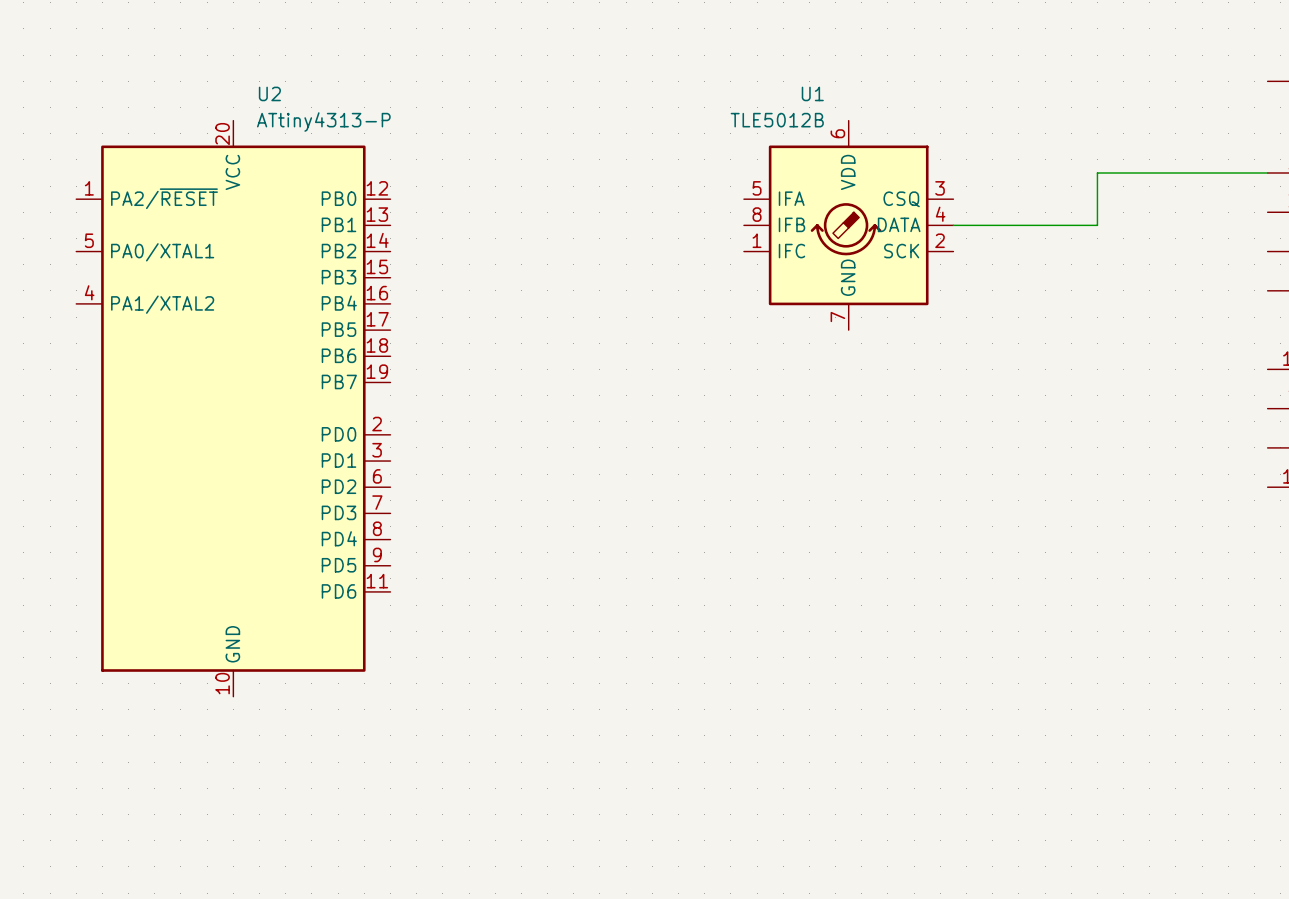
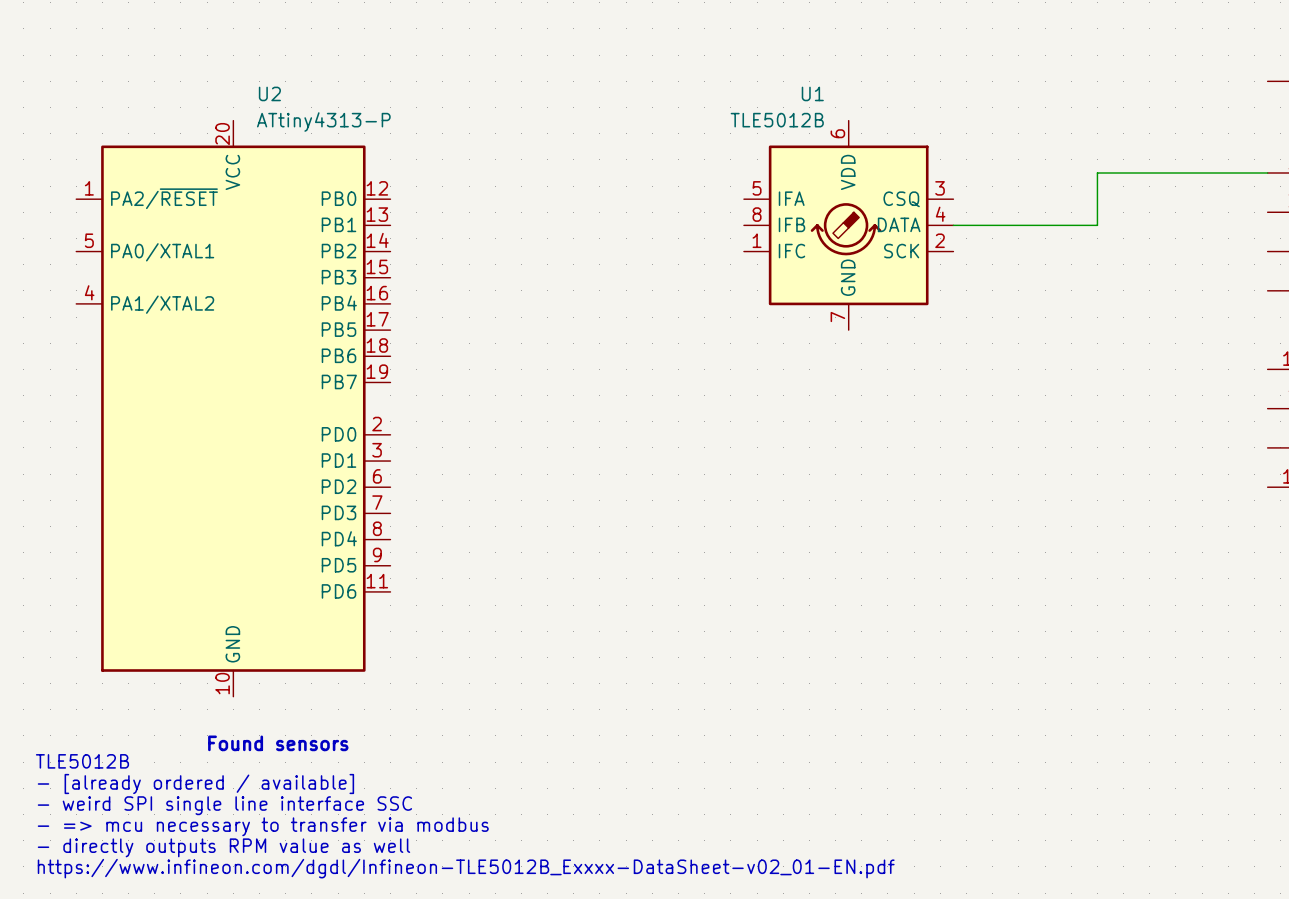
text: none -> Found sensors (278, 743)
text: none -> TLE5012B (82, 761)
text: none -> - [already ordered / available] (195, 784)
text: none -> - weird SPI single line interface SSC (224, 805)
text: none -> - => mcu necessary to transfer via modbus (263, 826)
text: none -> - directly outputs RPM value as well (223, 847)
text: none -> https://www.infineon.com/dgdl/Infineon-TLE5012B_Exxxx-DataSheet-v02_01-EN.pdf (466, 868)

